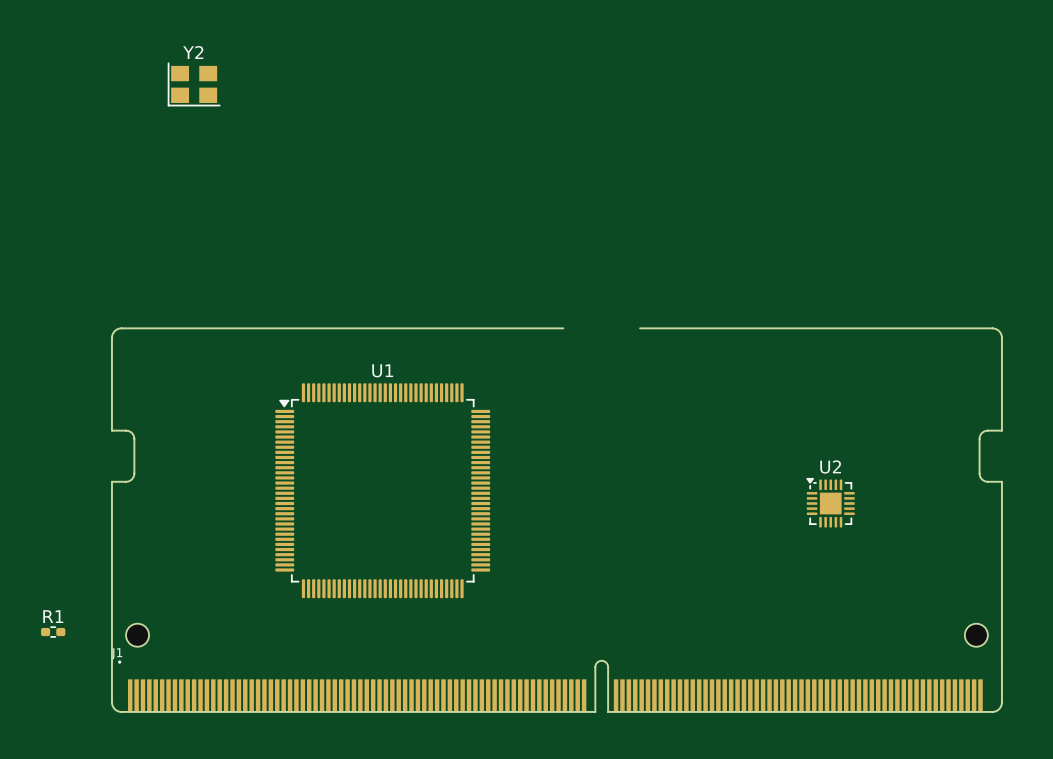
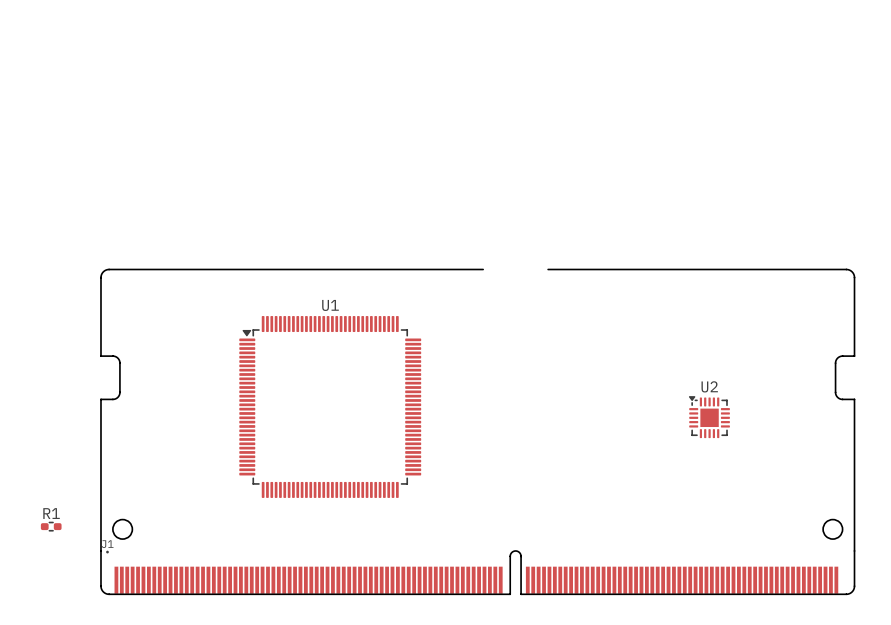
Y2: (194, 84) -> none

